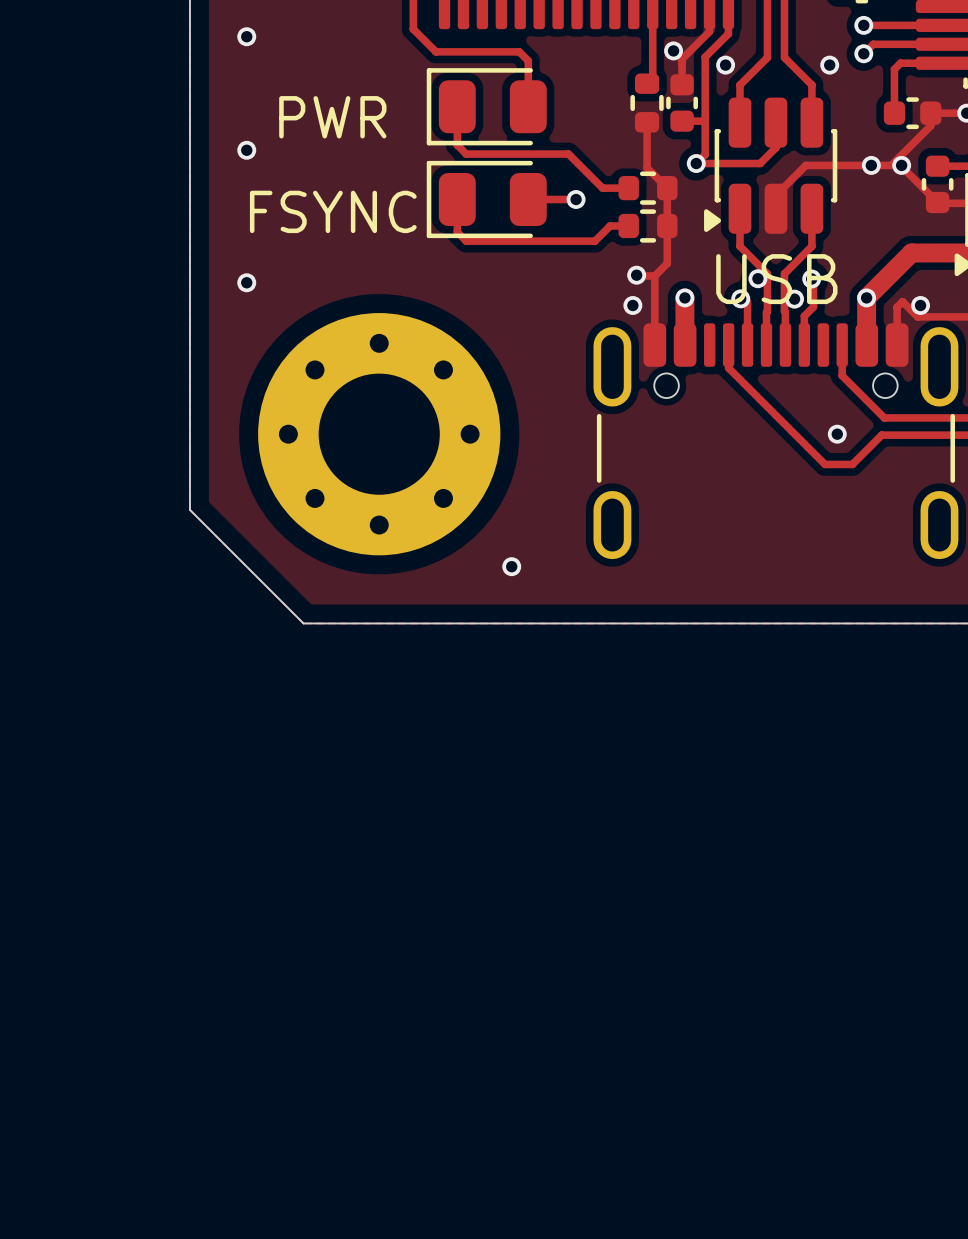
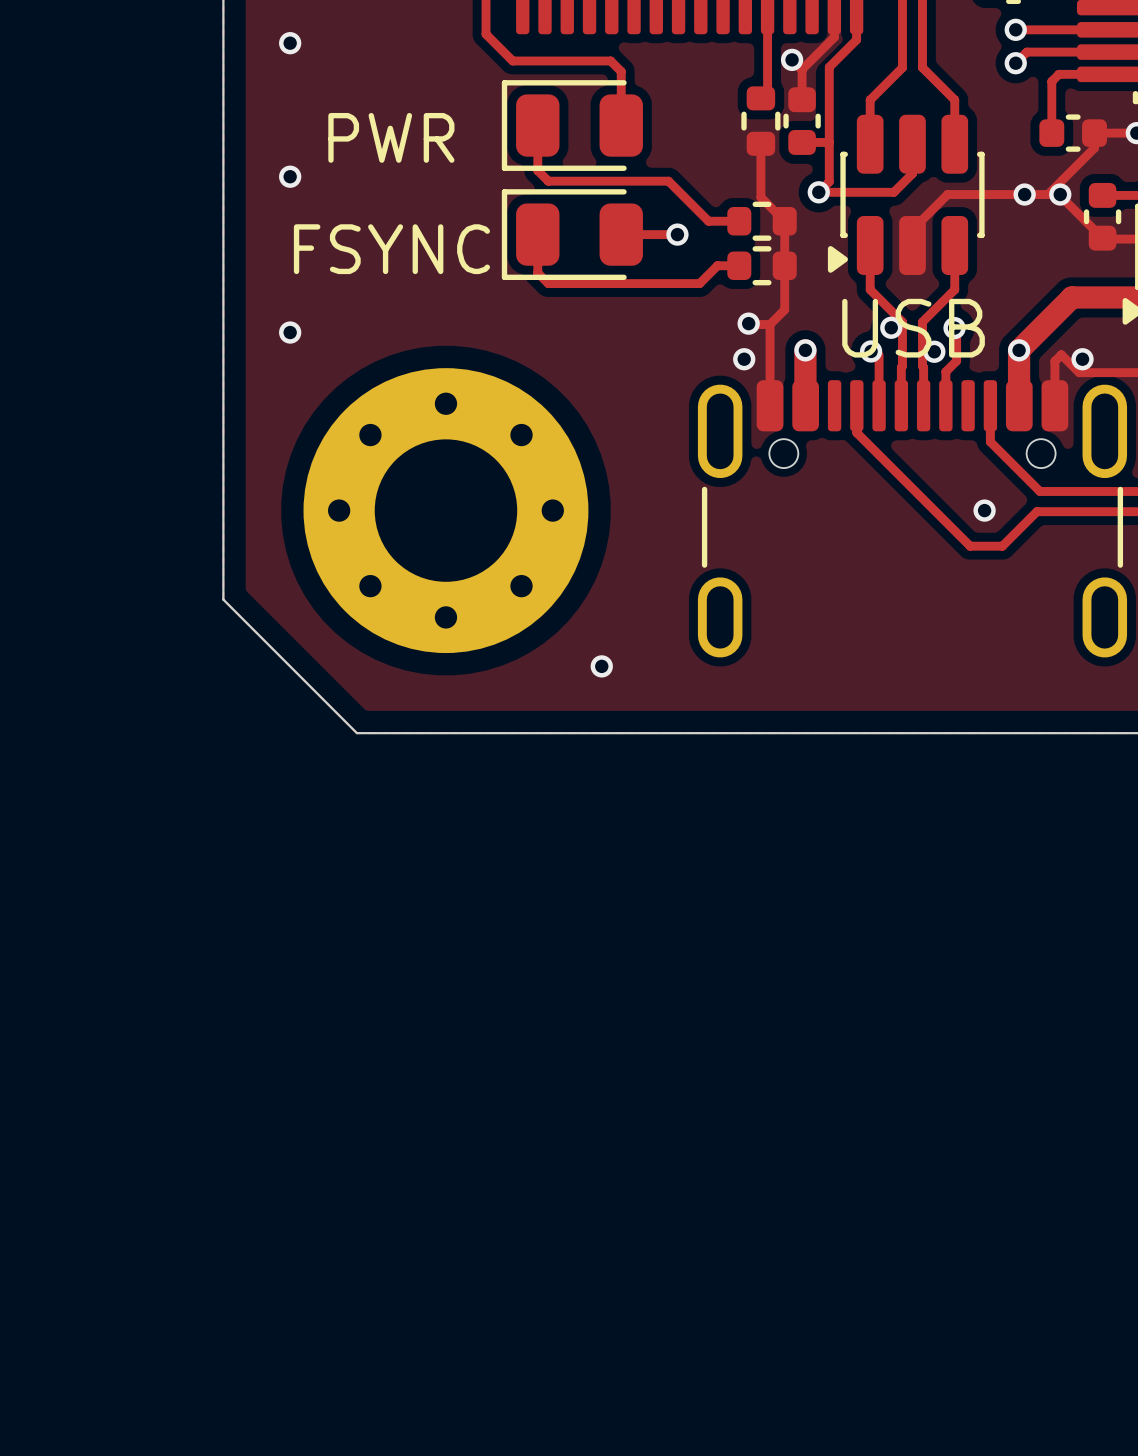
via: (725, 65) -> none
via: (829, 65) -> none

